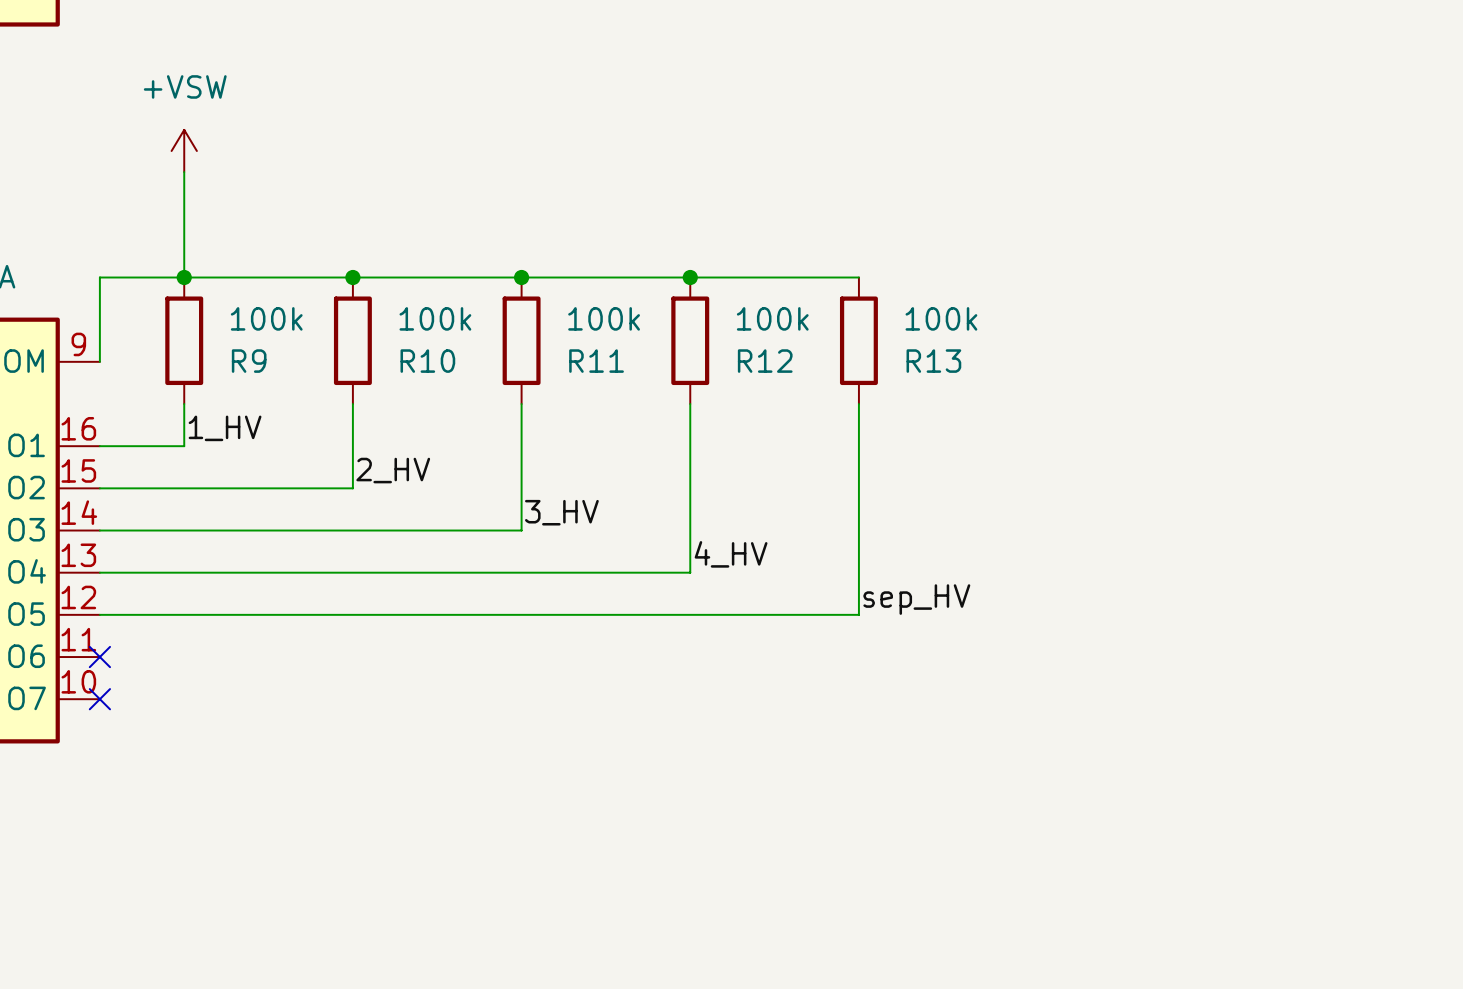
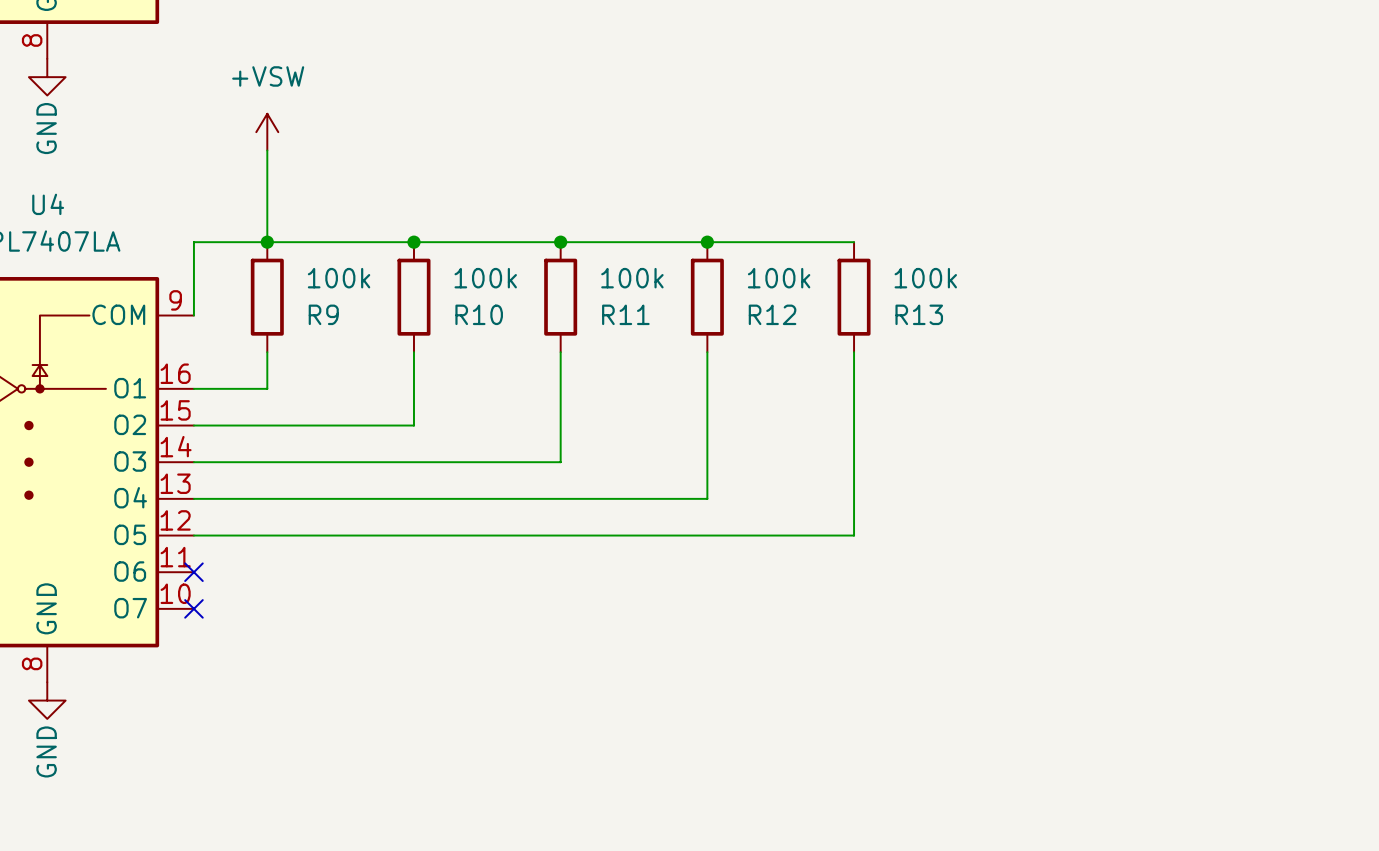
label: 1_HV (225, 428) -> none
label: 2_HV (393, 470) -> none
label: 3_HV (561, 512) -> none
label: 4_HV (731, 554) -> none
label: sep_HV (916, 599) -> none

